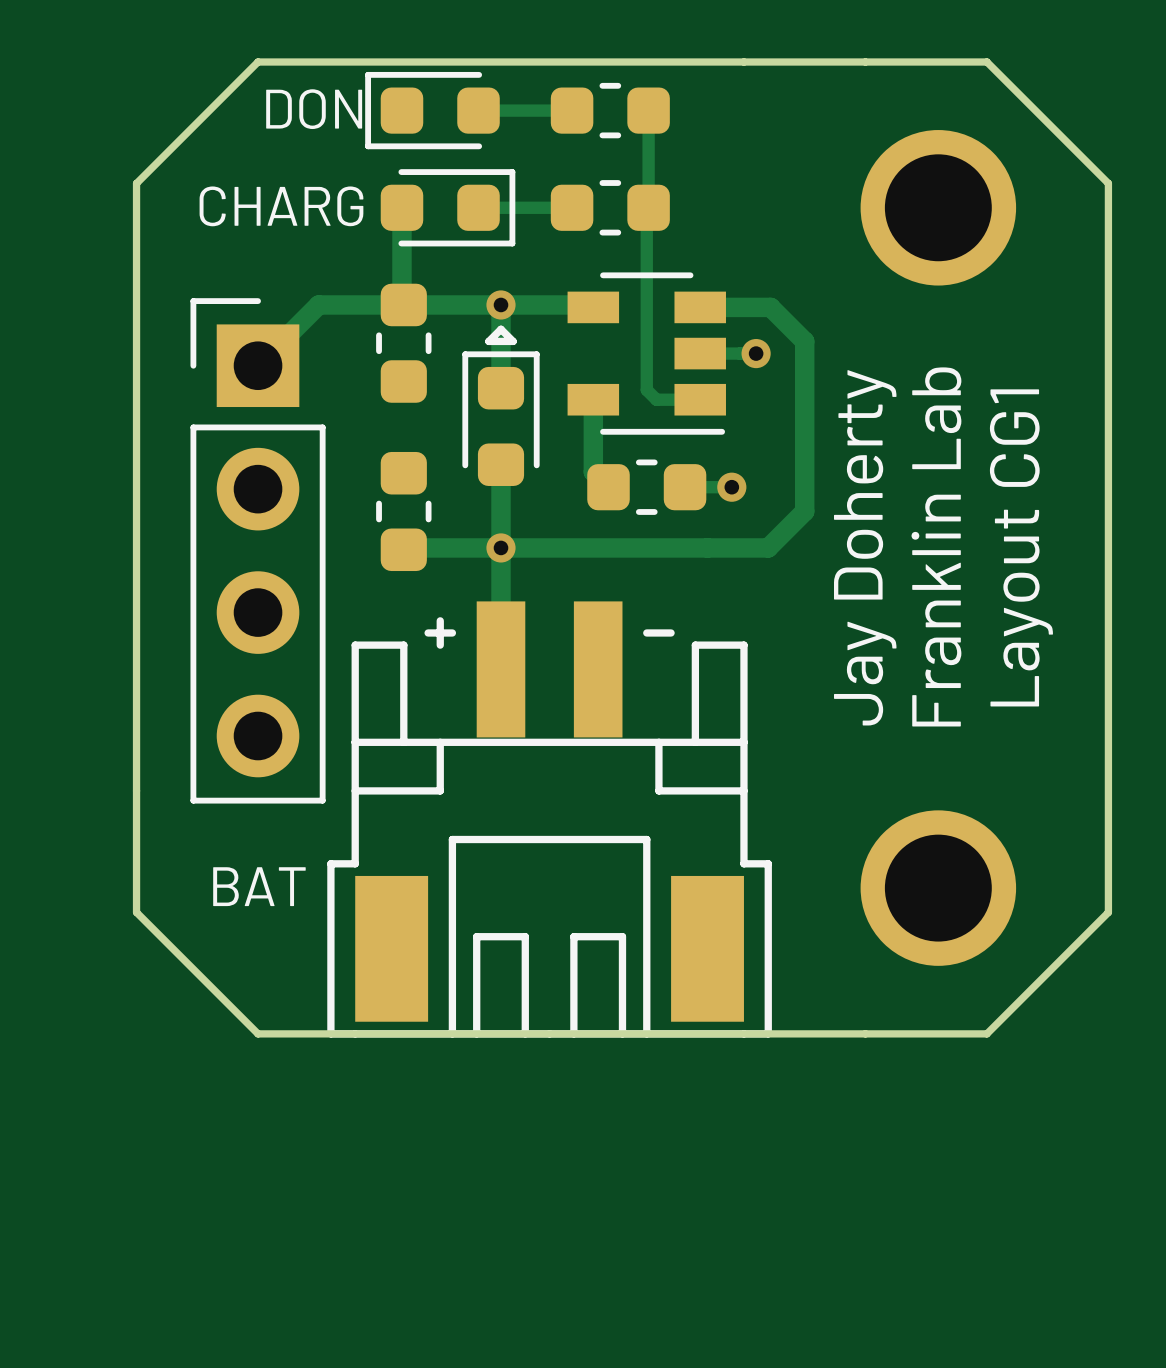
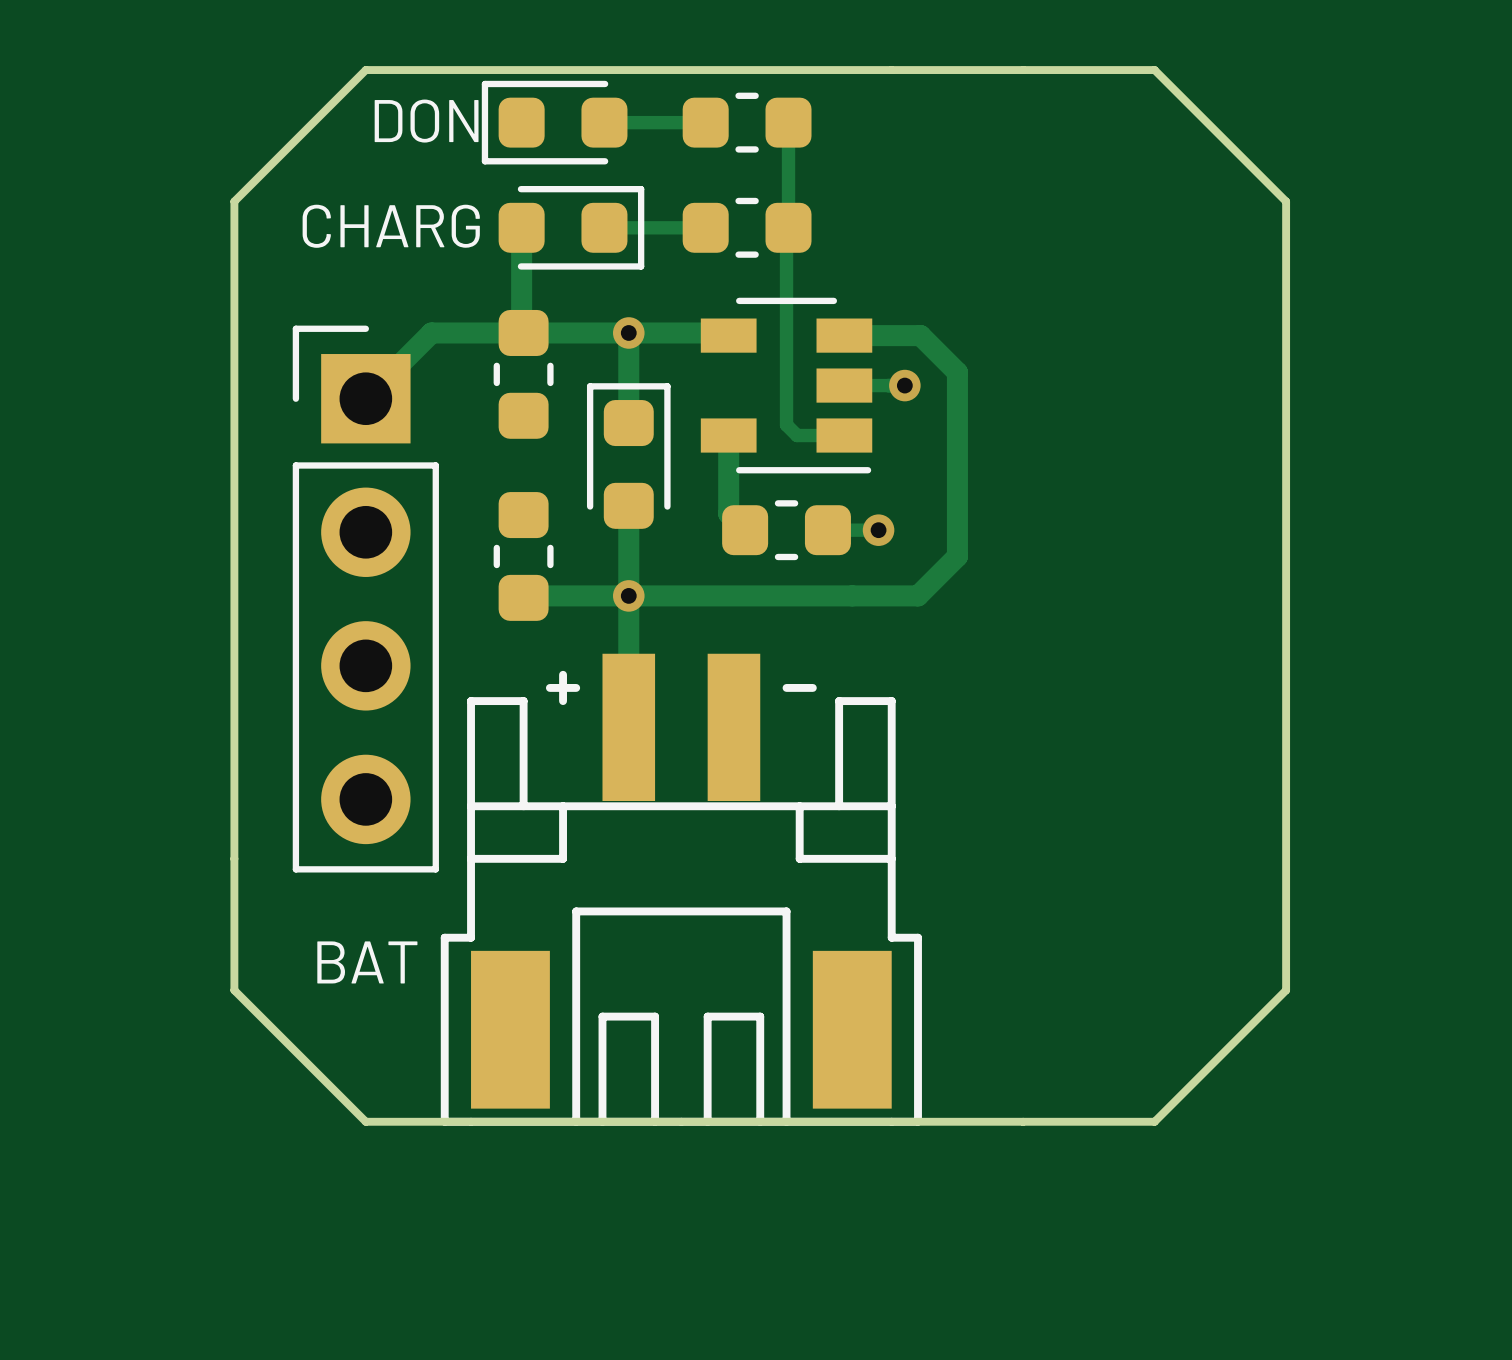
part: (938, 207) -> none
line: (500, 329) (488, 341) (513, 341) (500, 329) -> none
text: Franklin Lab (936, 546) -> none
text: Jay Doherty (865, 547) -> none
text: Layout CG1 (1021, 547) -> none
part: (938, 888) -> none

